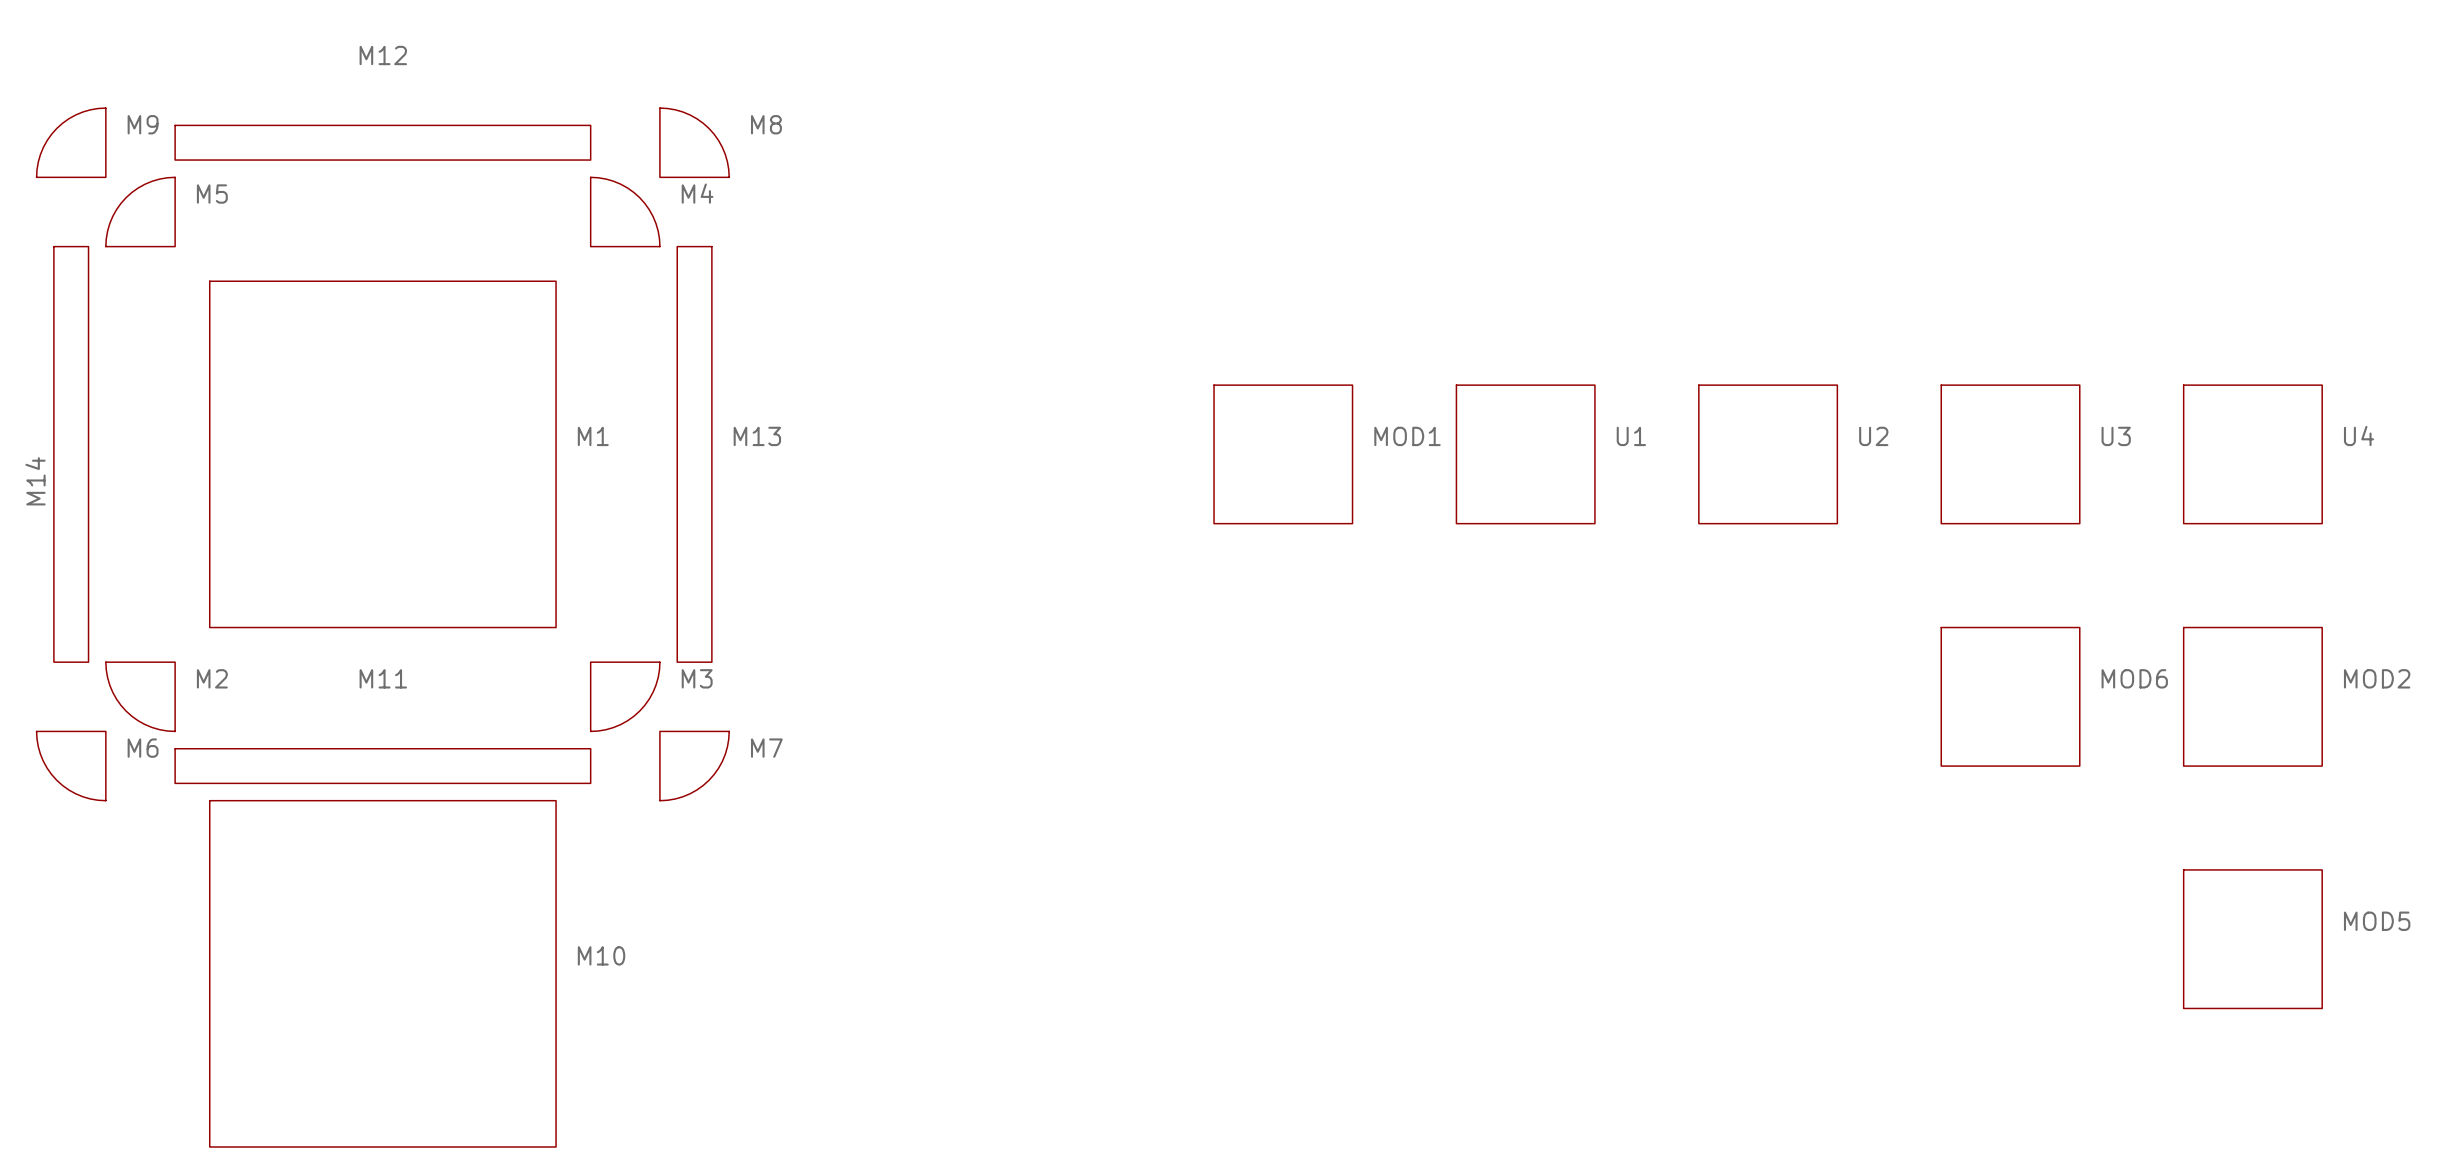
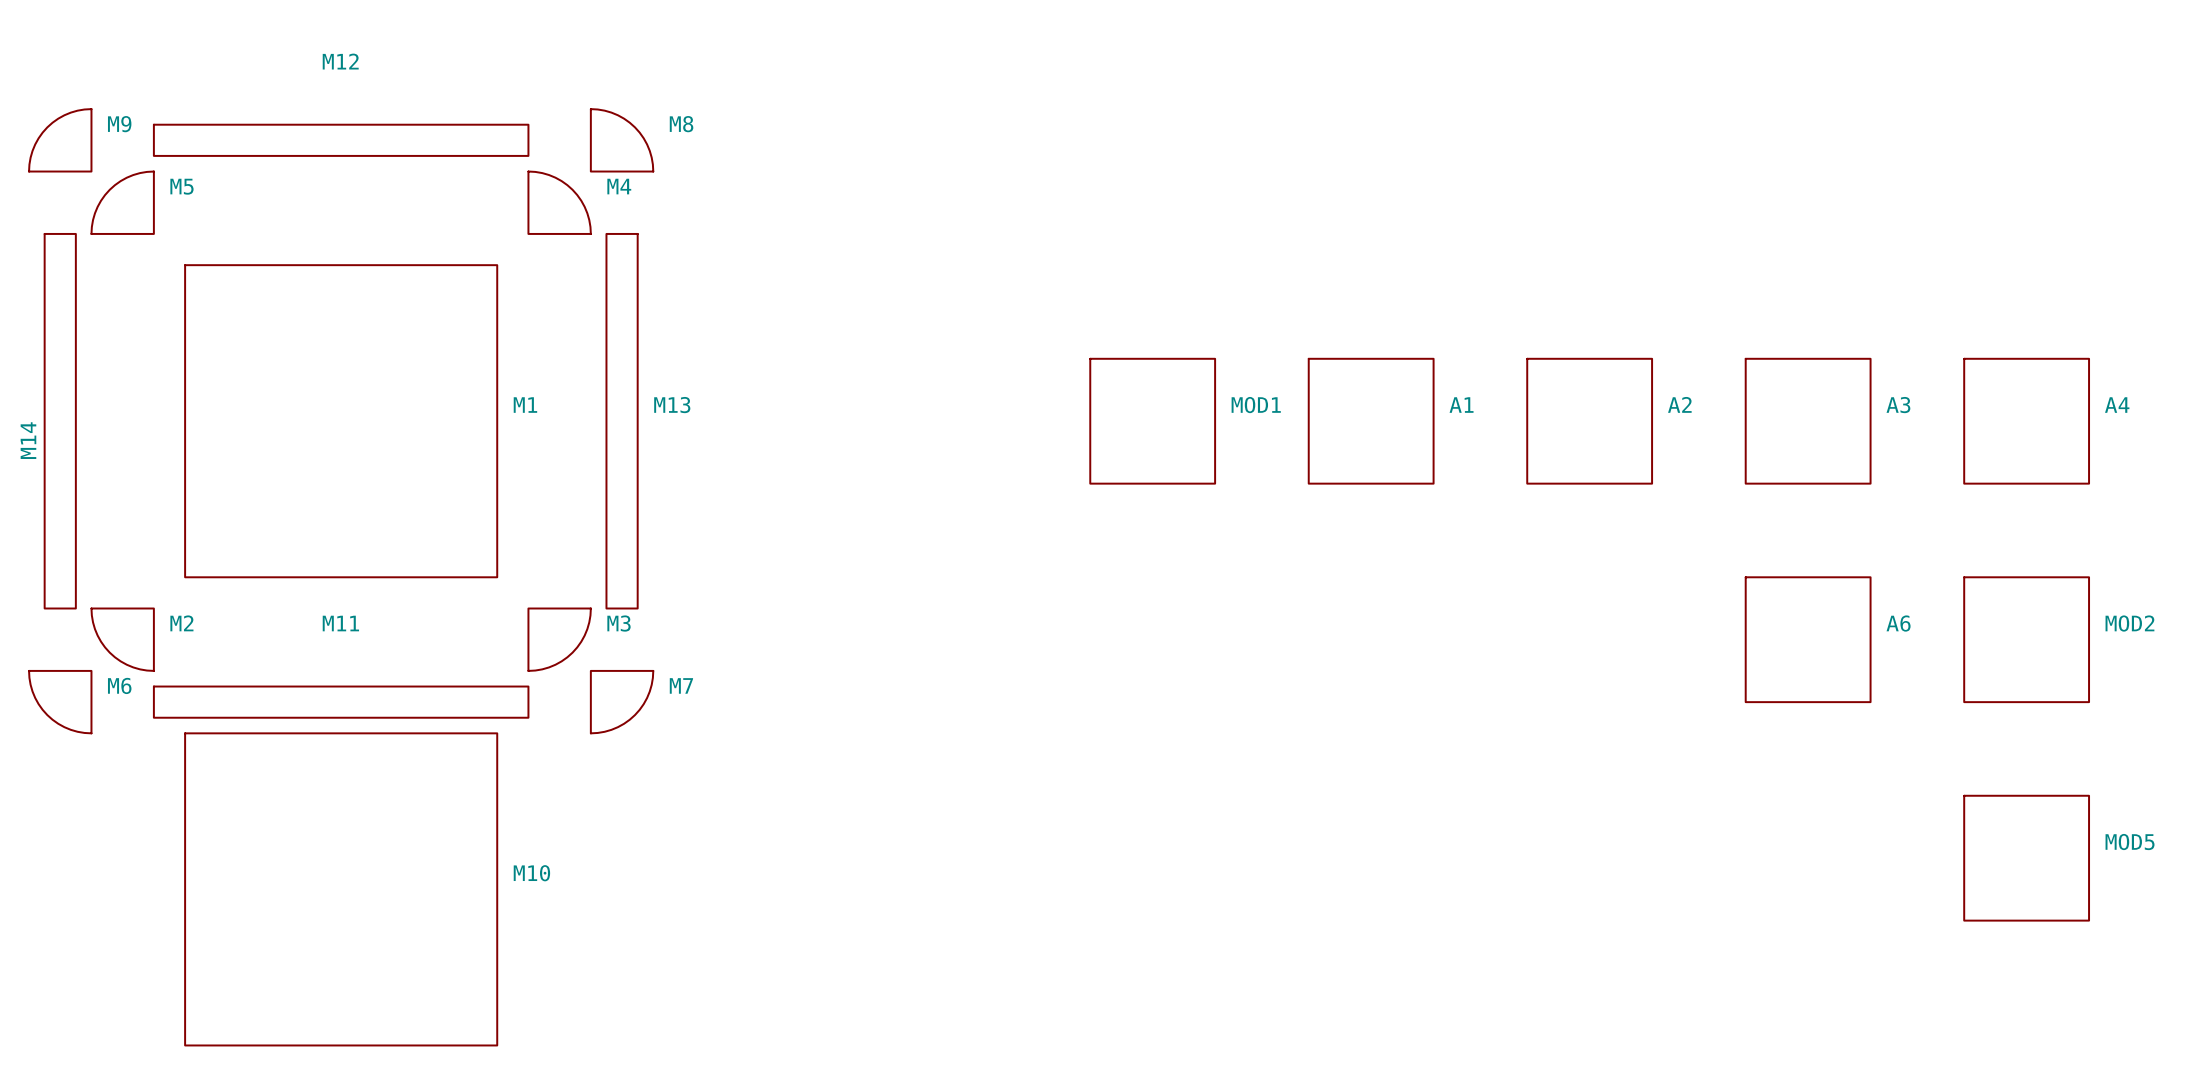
U1 name: U1 (1631, 436) -> A1 (1461, 405)
U2 name: U2 (1873, 436) -> A2 (1679, 404)
U3 name: U3 (2116, 436) -> A3 (1898, 405)
U4 name: U4 (2359, 436) -> A4 (2117, 405)
MOD6 name: MOD6 (2134, 678) -> A6 (1898, 623)

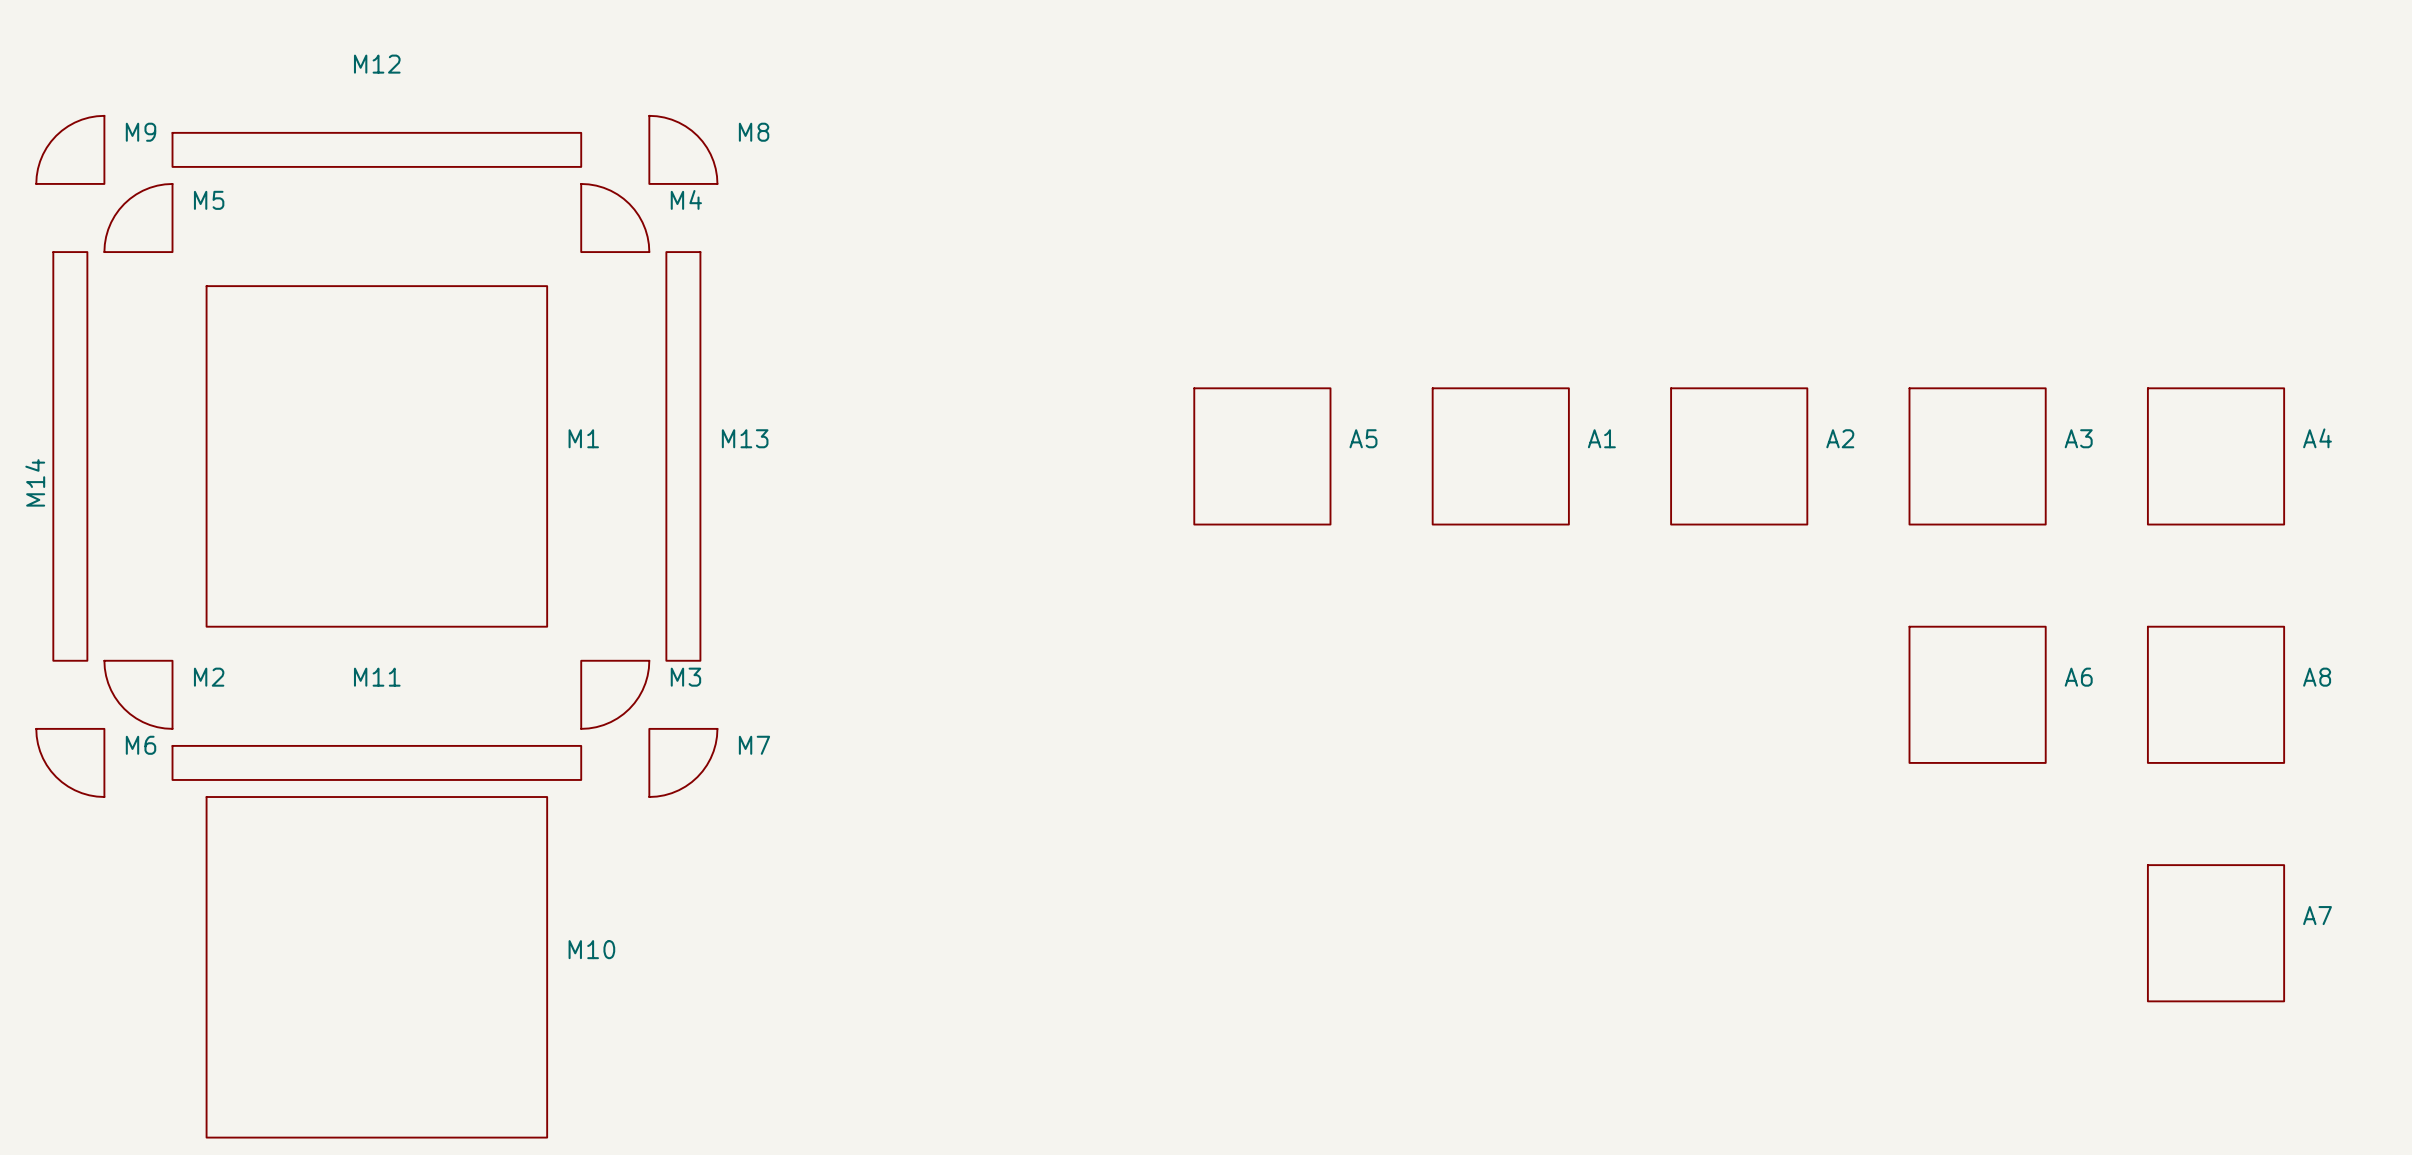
MOD1 name: MOD1 (1256, 405) -> A5 (1363, 438)
MOD2 name: MOD2 (2129, 623) -> A8 (2317, 677)
MOD5 name: MOD5 (2130, 842) -> A7 (2317, 915)

